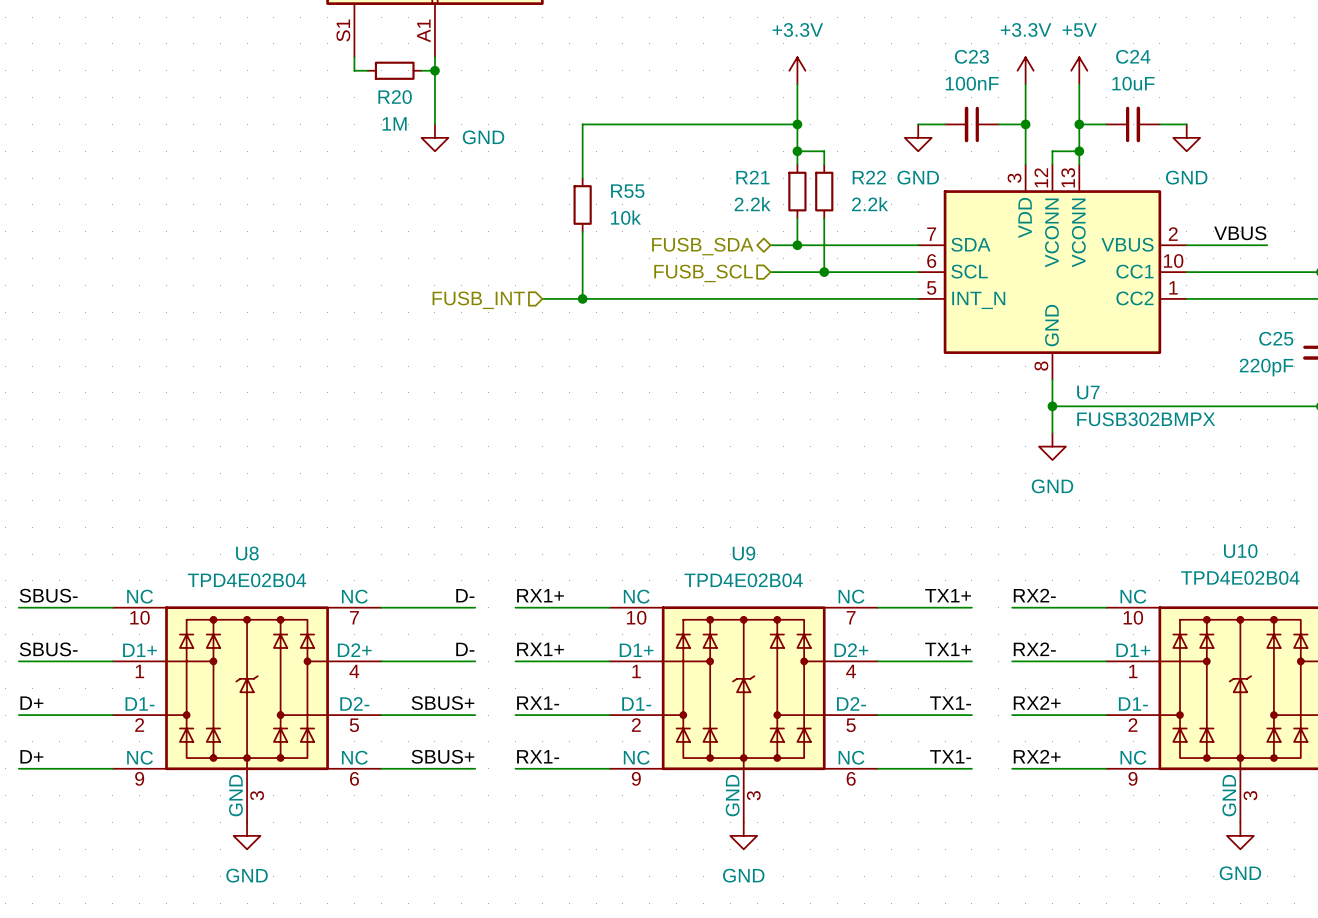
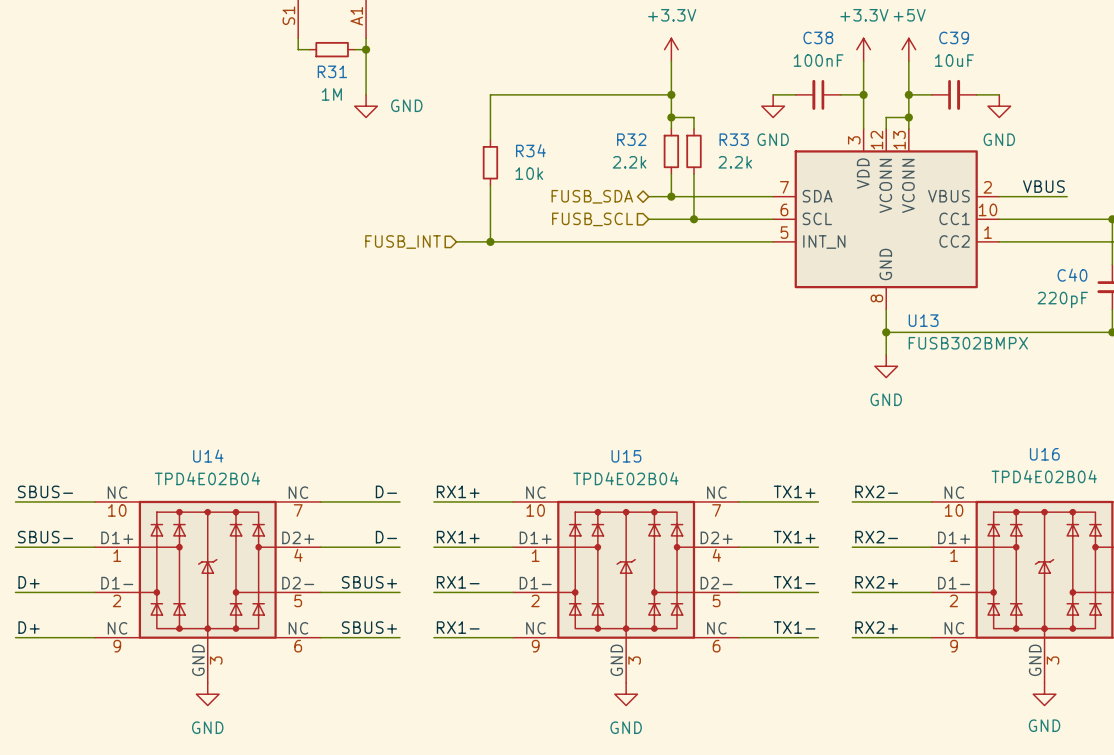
C23 name: C23 (971, 56) -> C38 (818, 37)
C24 name: C24 (1133, 56) -> C39 (954, 37)
R20 name: R20 (395, 97) -> R31 (332, 71)
R21 name: R21 (752, 177) -> R32 (631, 139)
R22 name: R22 (869, 177) -> R33 (734, 139)
R55 name: R55 (627, 191) -> R34 (530, 150)
C25 name: C25 (1276, 338) -> C40 (1072, 275)
U7 name: U7 (1088, 392) -> U13 (923, 320)
U10 name: U10 (1240, 551) -> U16 (1044, 454)
U8 name: U8 (247, 553) -> U14 (208, 456)
U9 name: U9 (744, 553) -> U15 (626, 456)

